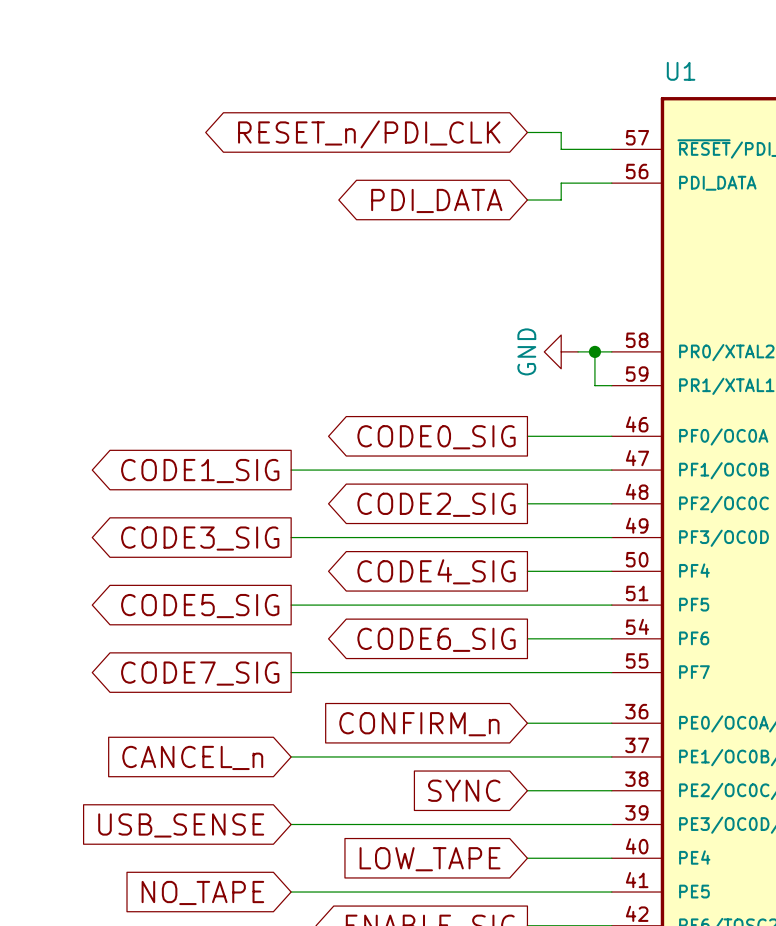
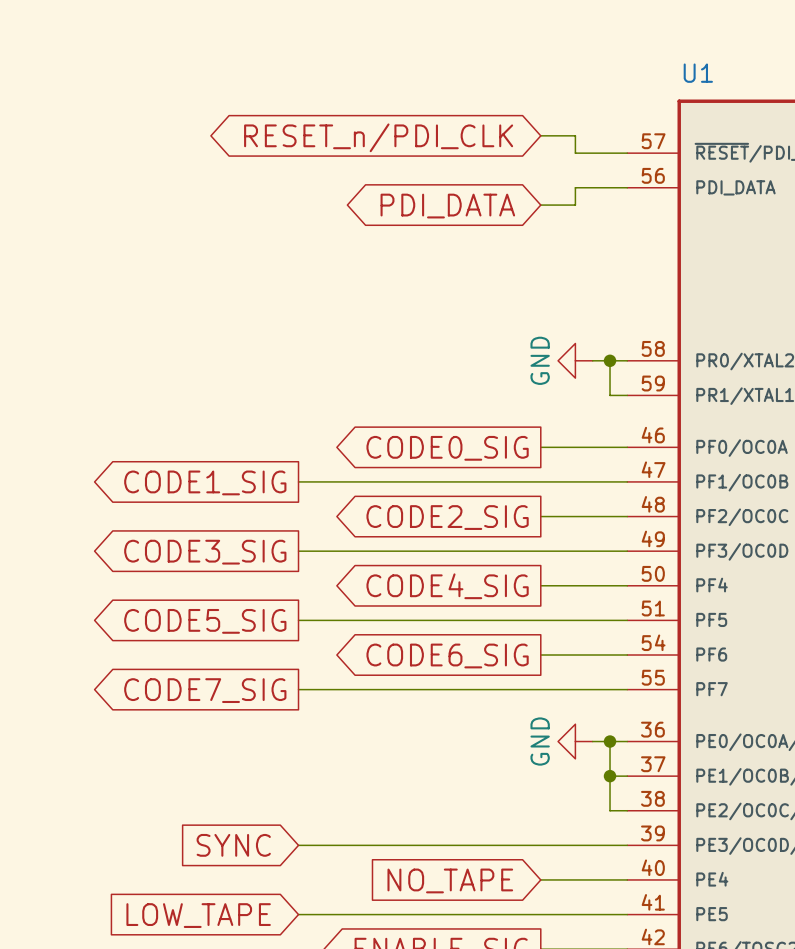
wire: (527, 723) (578, 723) -> none
power symbol: none -> GND (575, 741)
junction: none -> (610, 741)
global label: CONFIRM_n (419, 724) -> none
wire: (291, 756) (594, 756) -> none
junction: none -> (610, 776)
global label: CANCEL_n (192, 757) -> none
global label: SYNC (464, 790) -> none
wire: (527, 790) (594, 790) -> (610, 741) (610, 810)
global label: USB_SENSE (181, 825) -> SYNC (233, 845)
global label: LOW_TAPE (430, 859) -> NO_TAPE (450, 880)
global label: NO_TAPE (202, 892) -> LOW_TAPE (198, 915)

